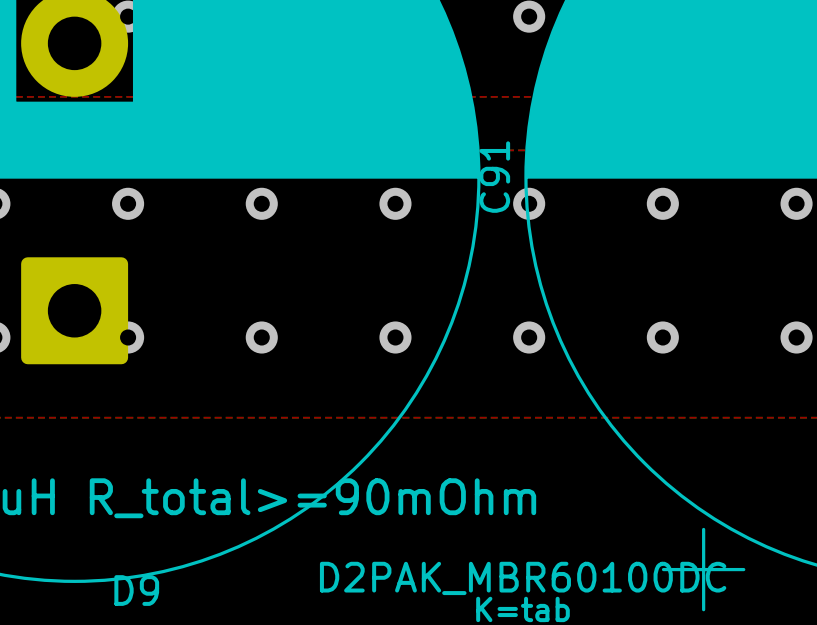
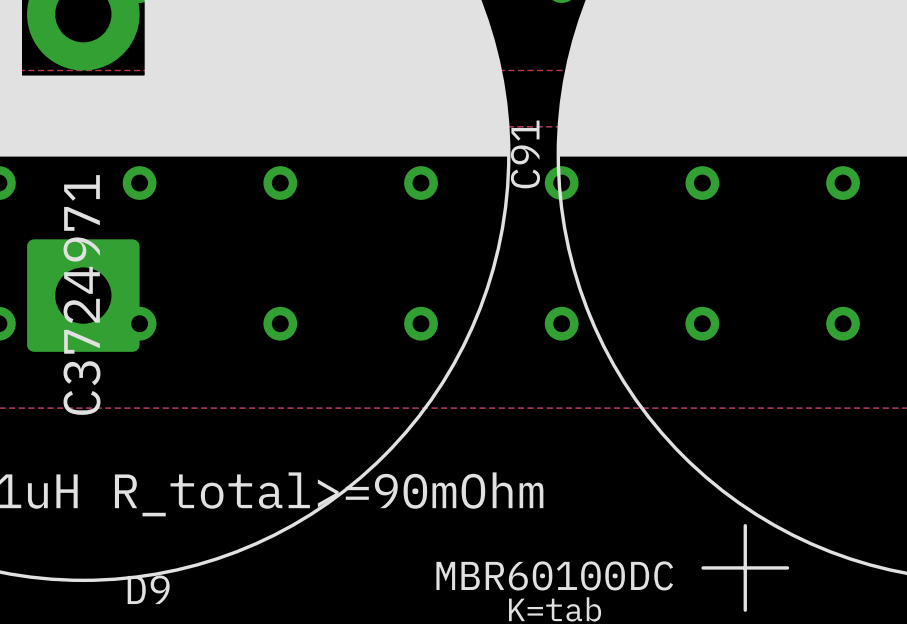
part text: none -> C3724971 (81, 295)
part value: D2PAK_MBR60100DC (523, 578) -> MBR60100DC (554, 575)

